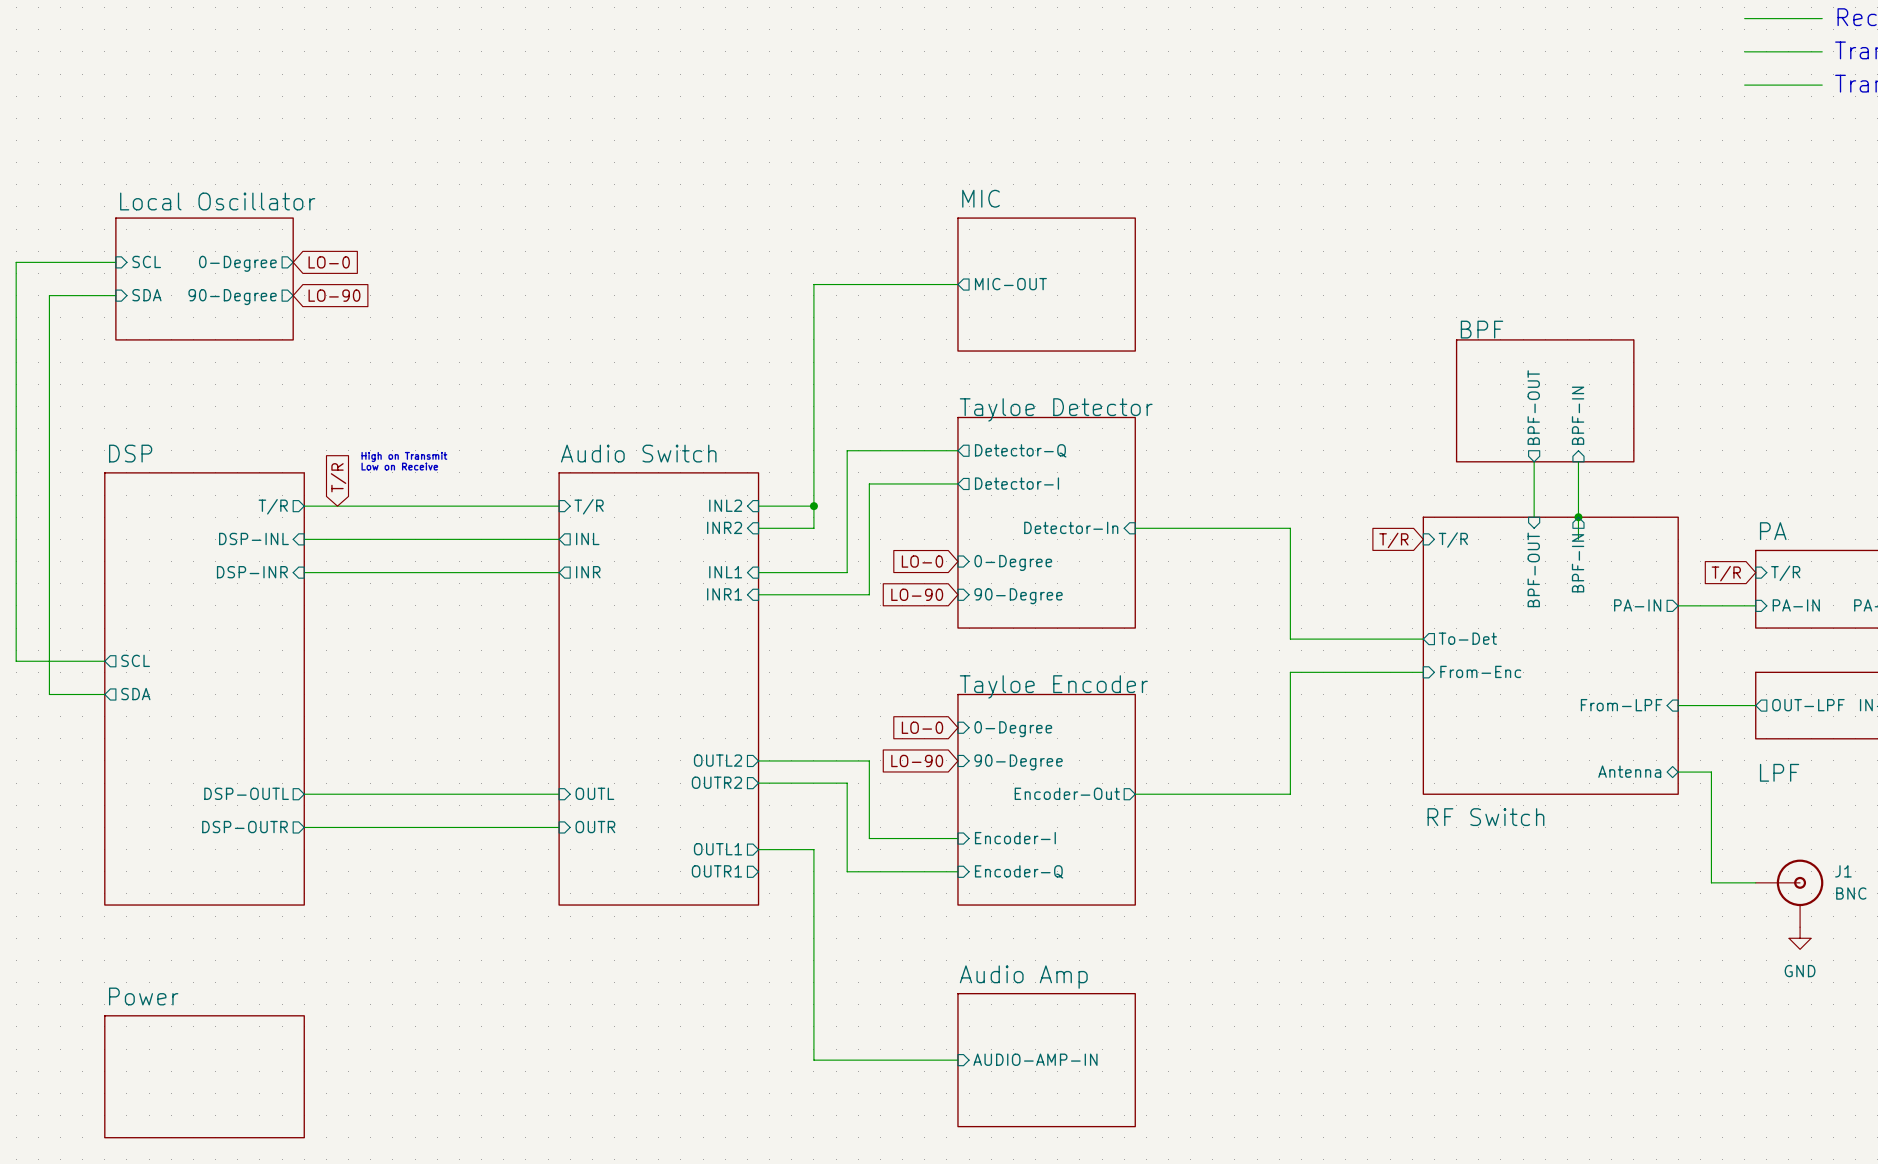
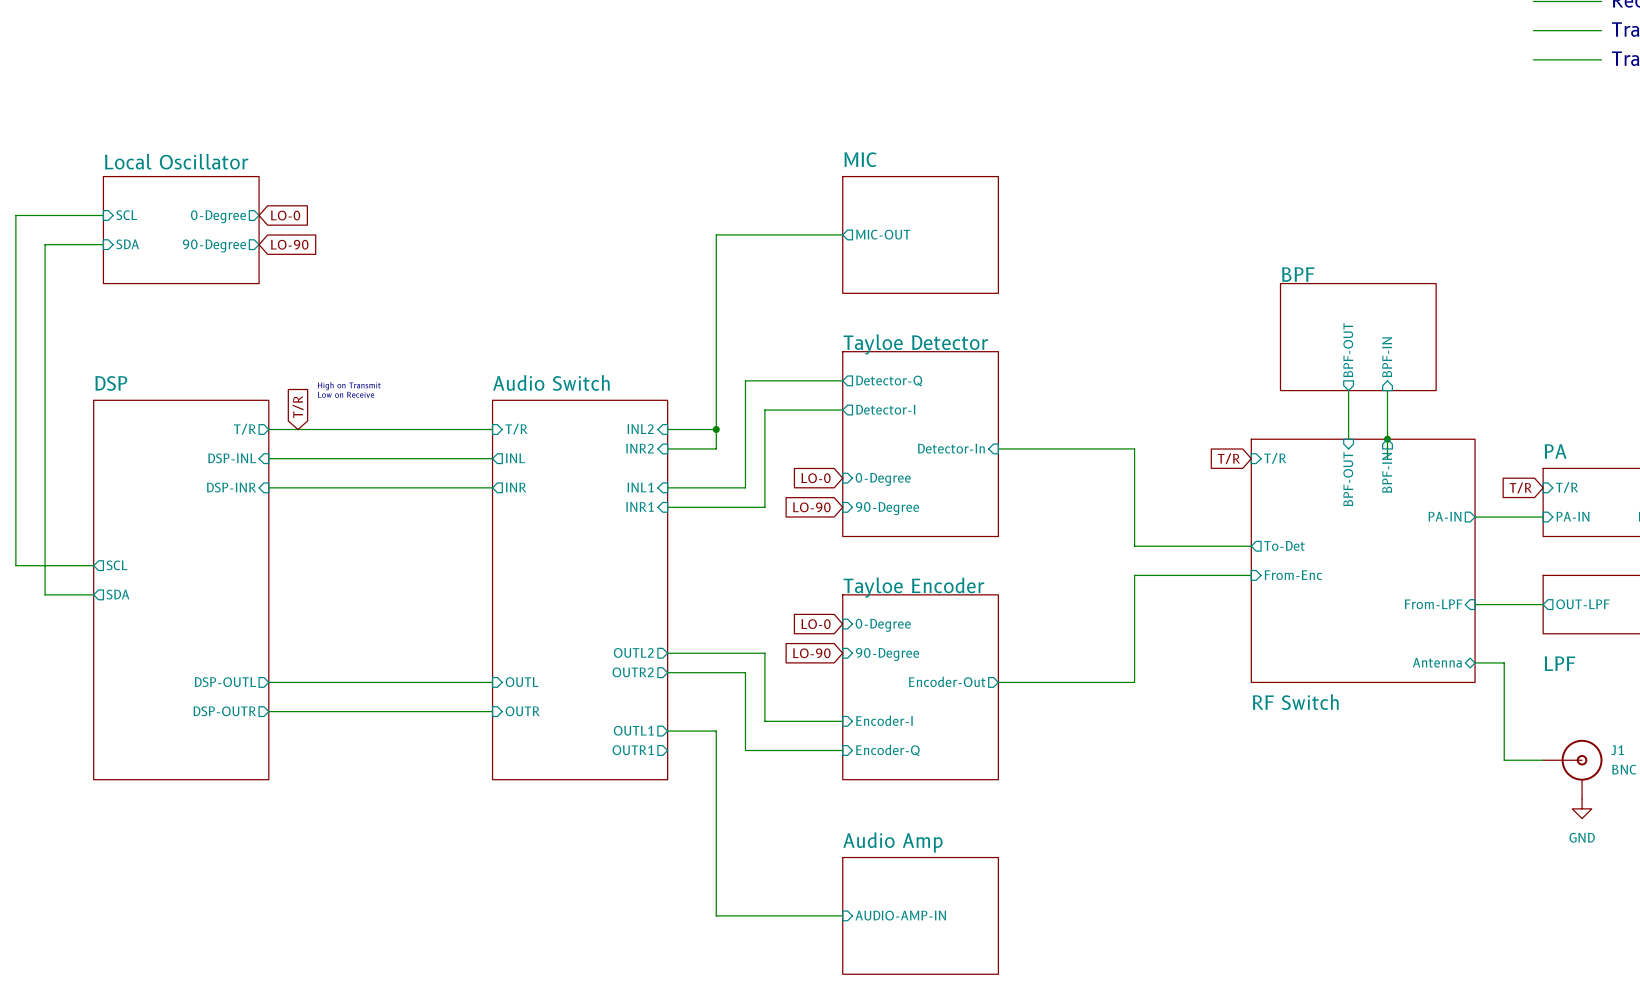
sheet Power: (204, 1076) -> none

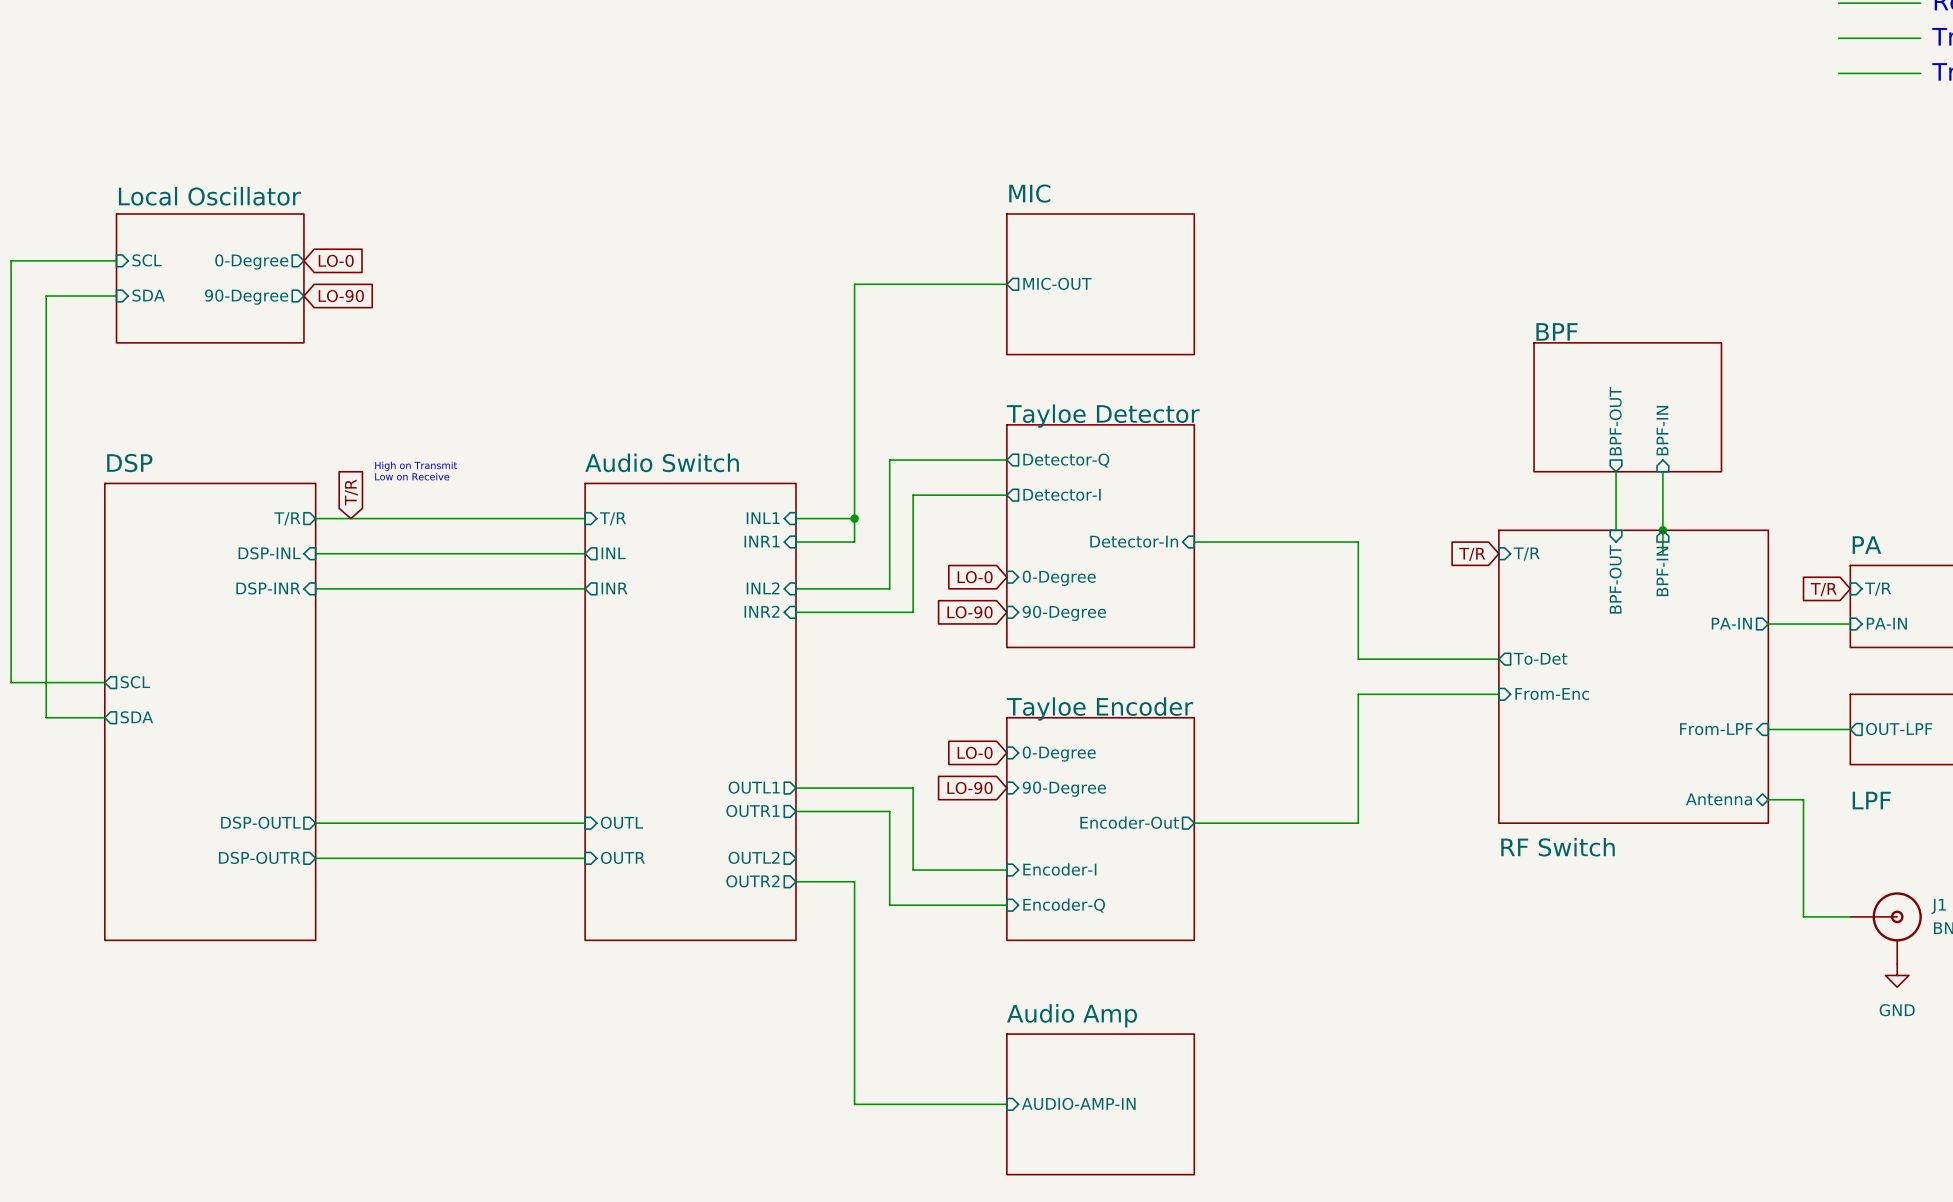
sheet pin: INL2 (640, 429) -> INL1 (763, 518)
sheet pin: INR2 (639, 448) -> INR1 (762, 541)
sheet pin: INL1 (640, 487) -> INL2 (763, 588)
sheet pin: INR1 (639, 506) -> INR2 (762, 611)
sheet pin: OUTL2 (633, 652) -> OUTL1 (754, 787)
sheet pin: OUTR2 (633, 672) -> OUTR1 (753, 811)
sheet pin: none -> OUTL2 (754, 857)
sheet pin: OUTL1 (633, 730) -> OUTR2 (752, 881)
sheet pin: OUTR1 (633, 750) -> none

